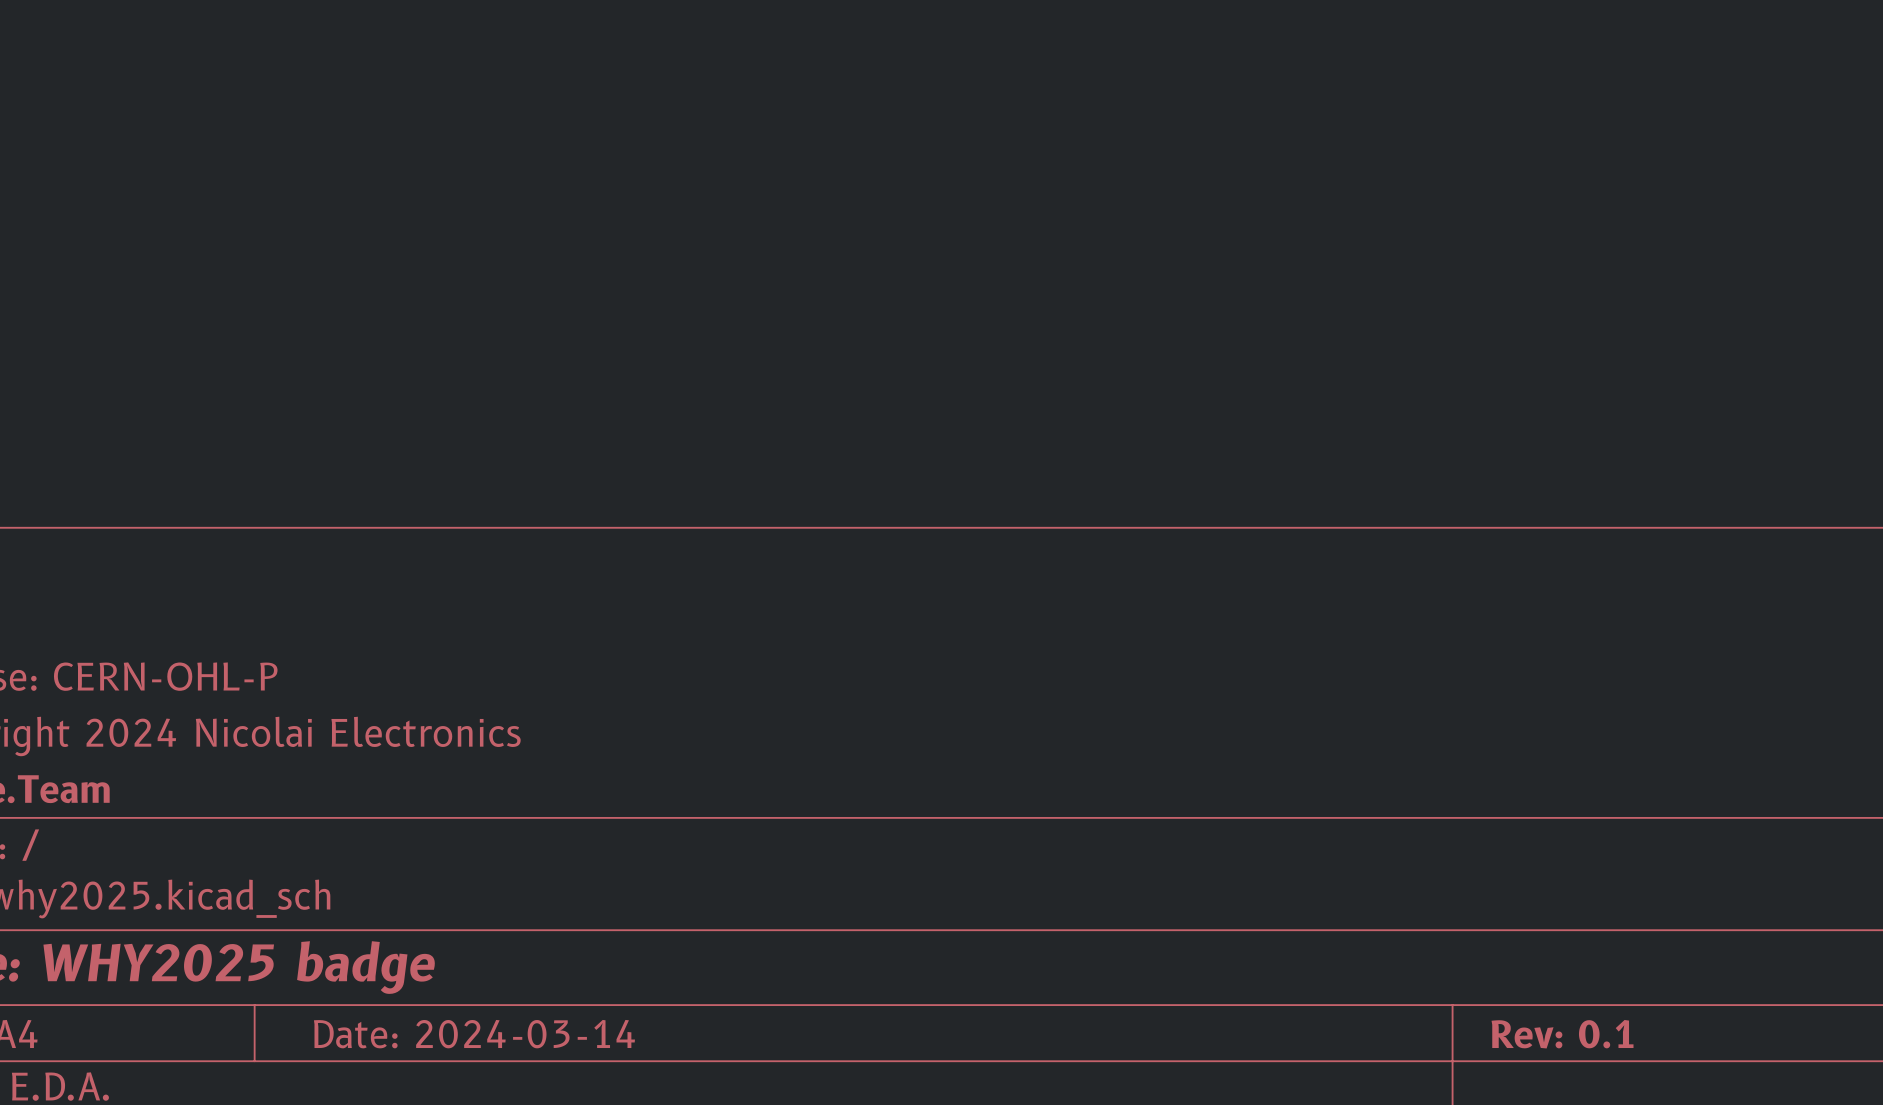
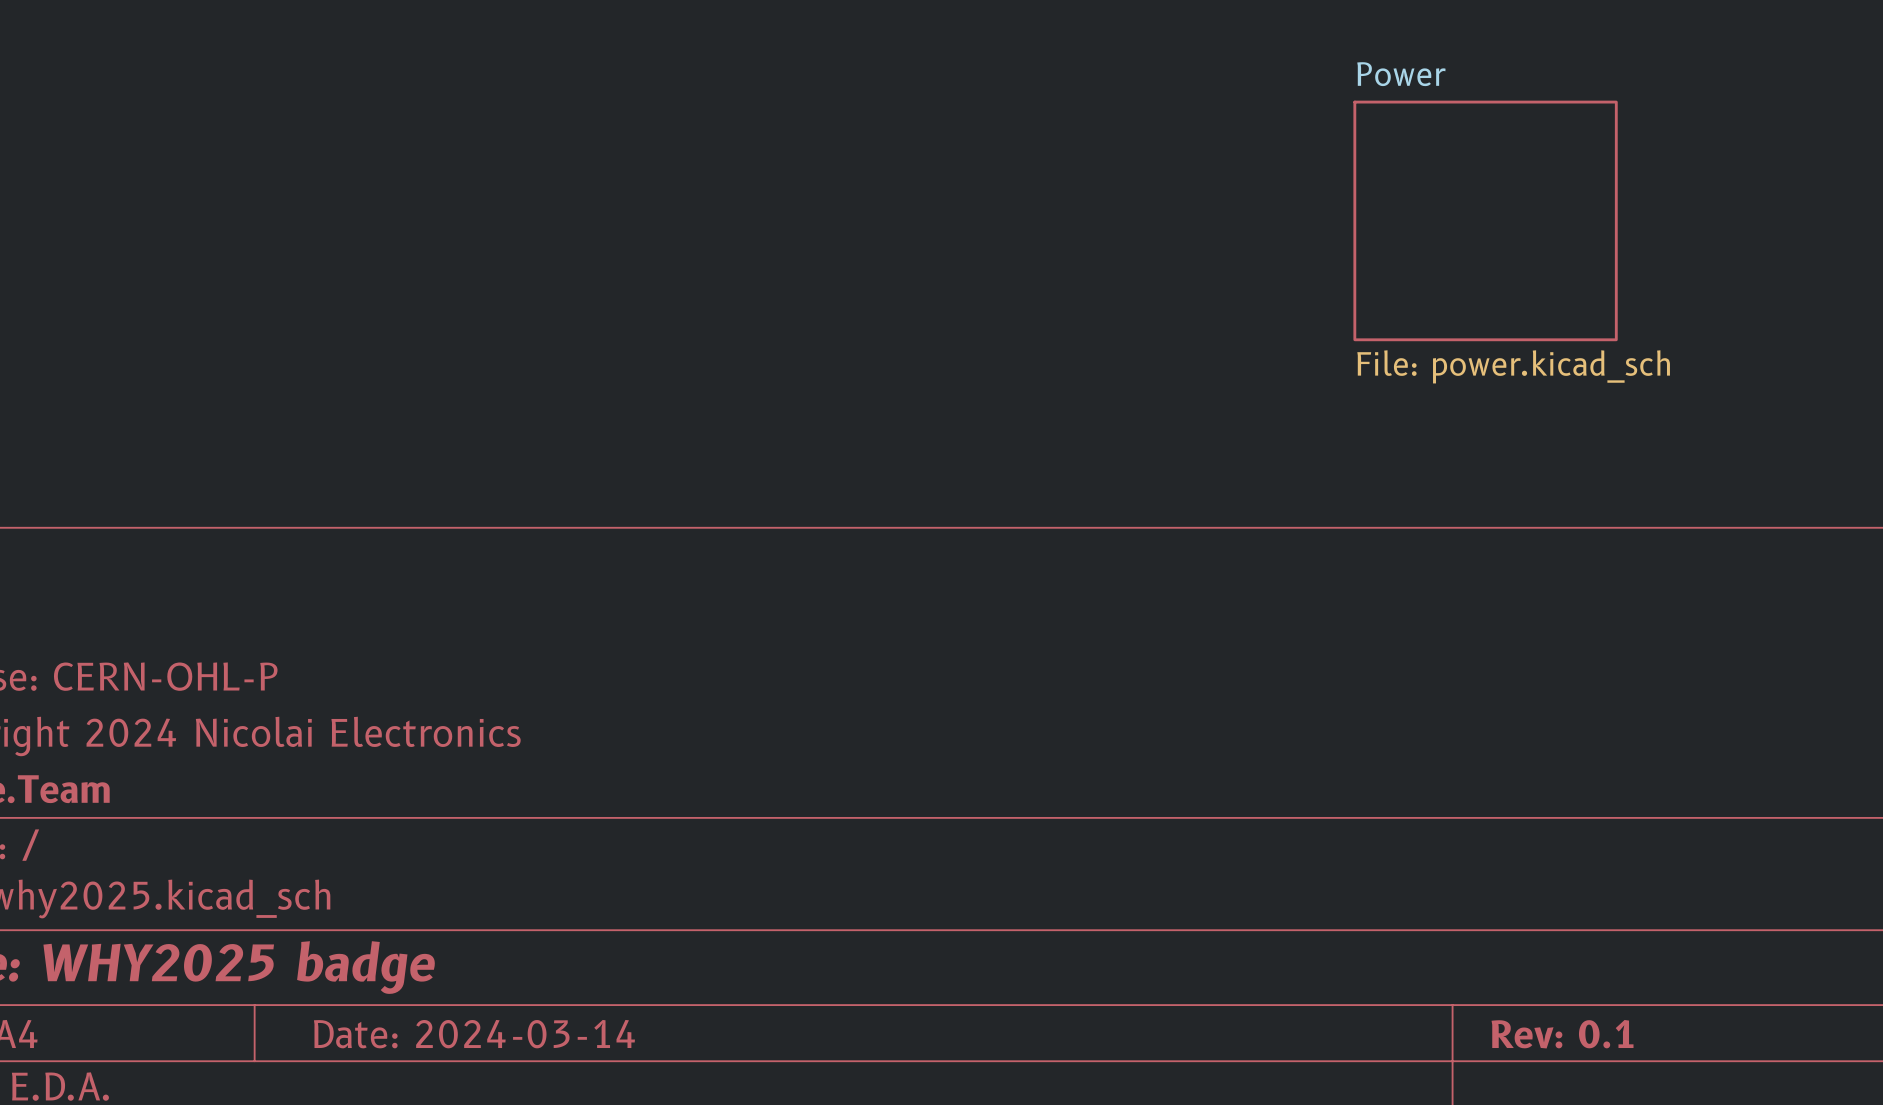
sheet Power: none -> File: power.kicad_sch (1485, 220)

